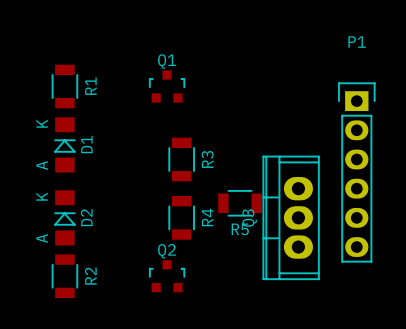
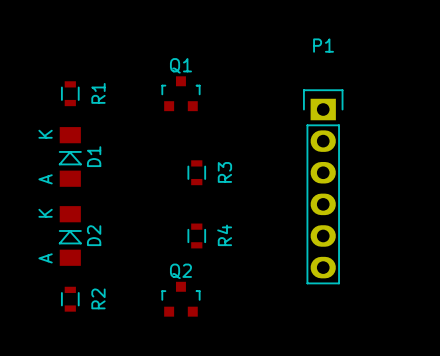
R1 footprint: [51, 64, 79, 109] -> [60, 81, 80, 107]
R3 footprint: [168, 137, 195, 182] -> [187, 160, 207, 186]
P1 position: (356, 172) -> (323, 186)
R4 footprint: [168, 196, 195, 240] -> [187, 223, 207, 249]
R5: (240, 203) -> none
Q3: (291, 217) -> none
R2 footprint: [51, 254, 79, 299] -> [60, 286, 80, 312]

